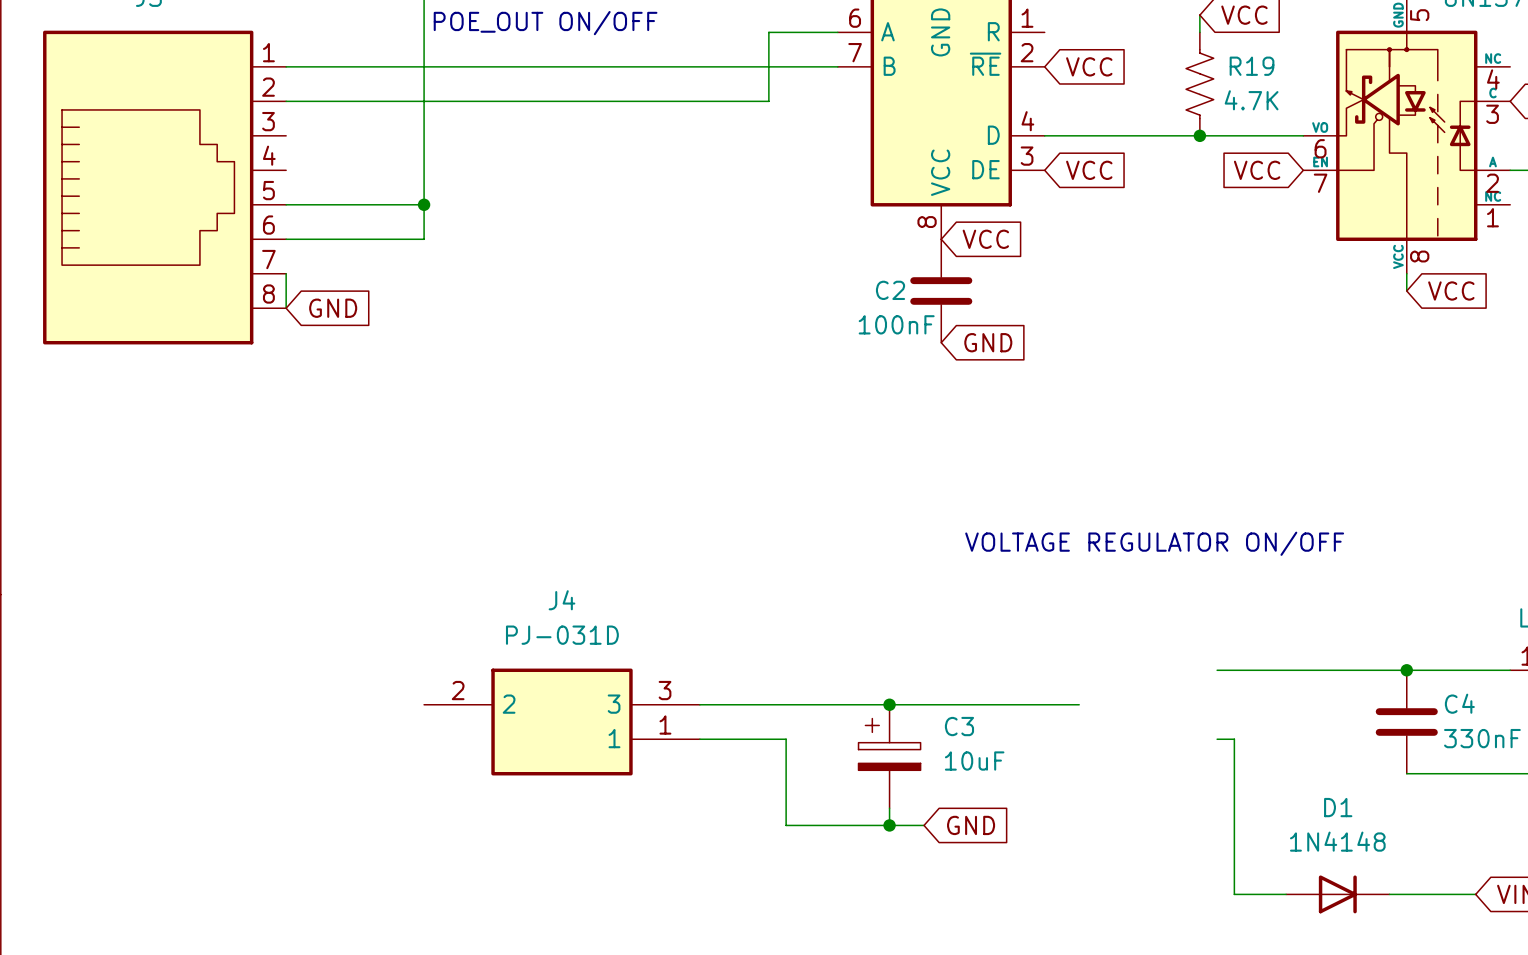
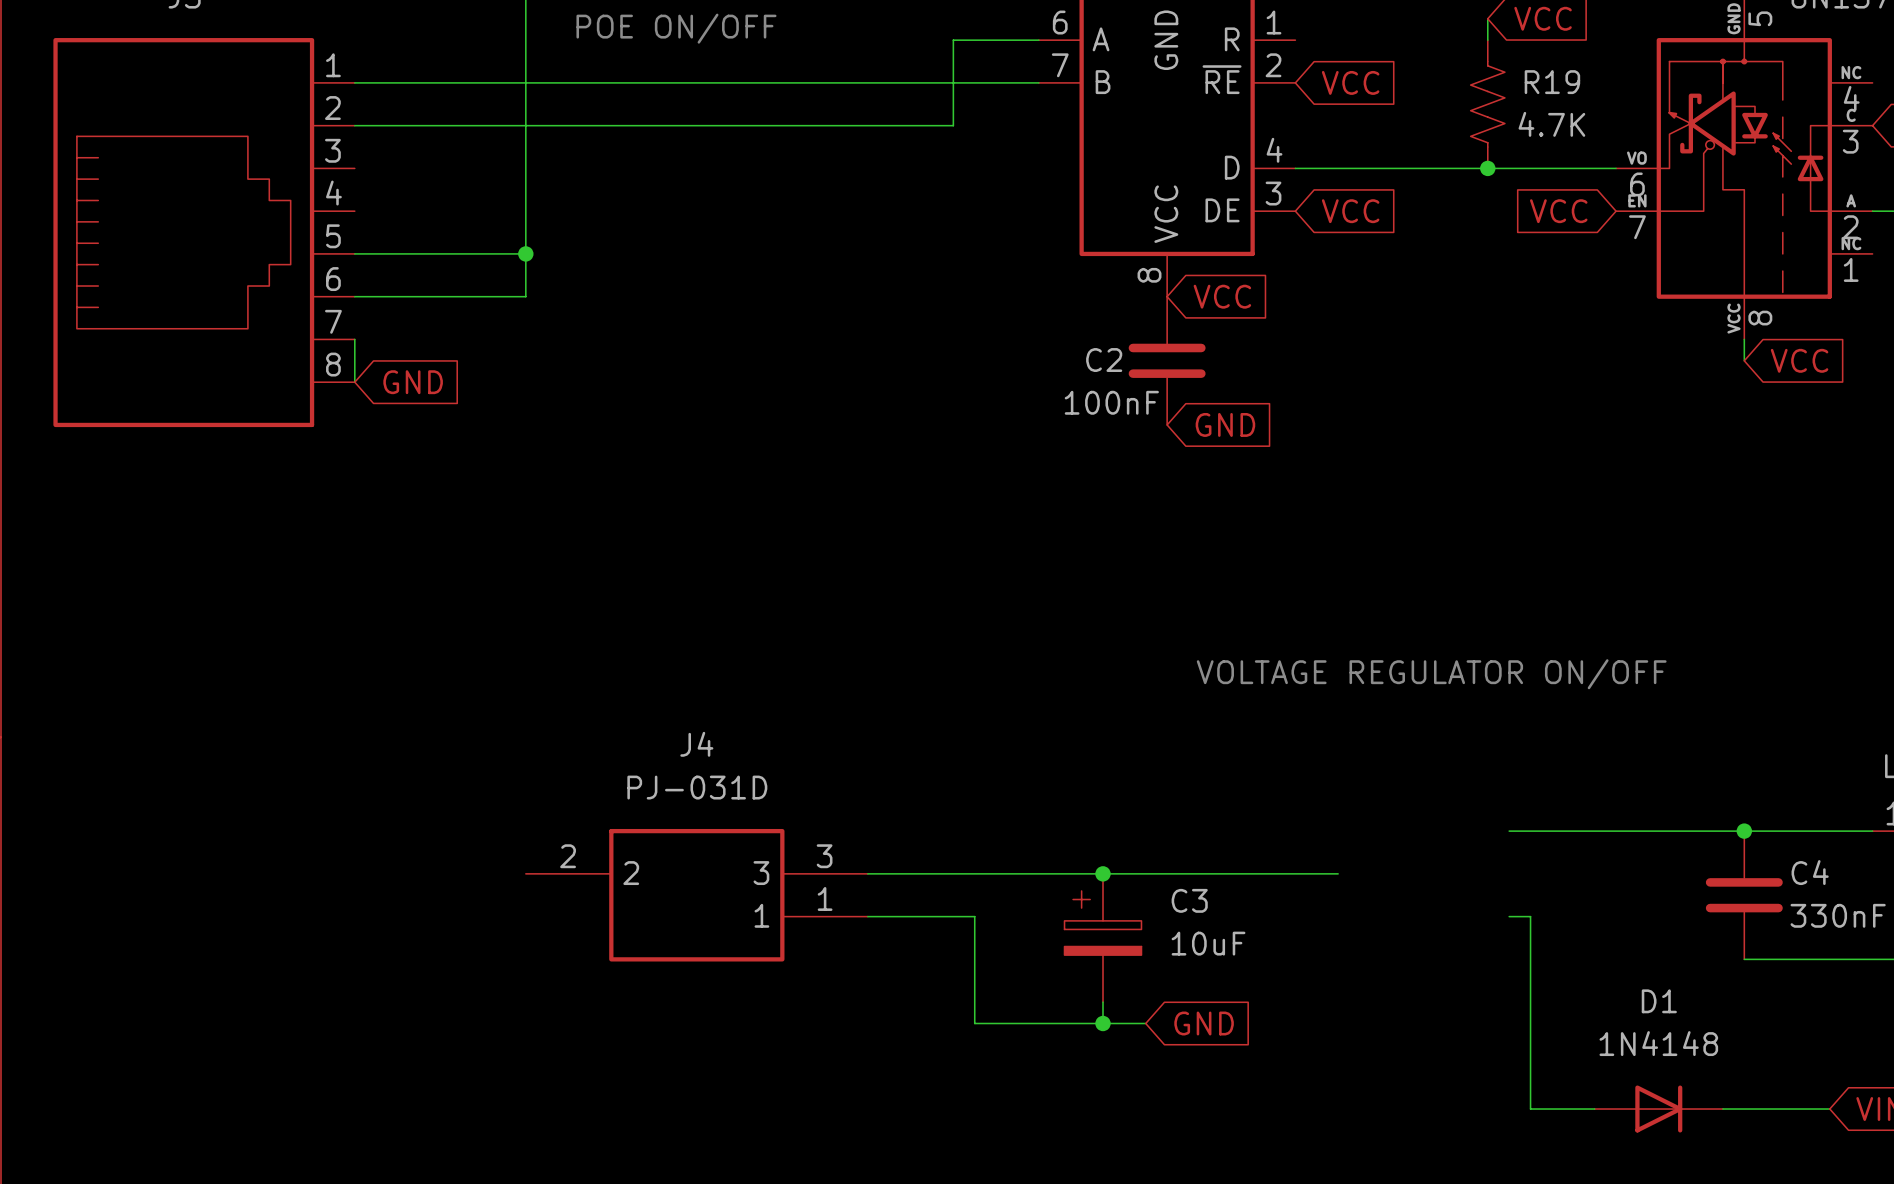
text: POE_OUT ON/OFF (545, 23) -> POE ON/OFF (676, 28)

